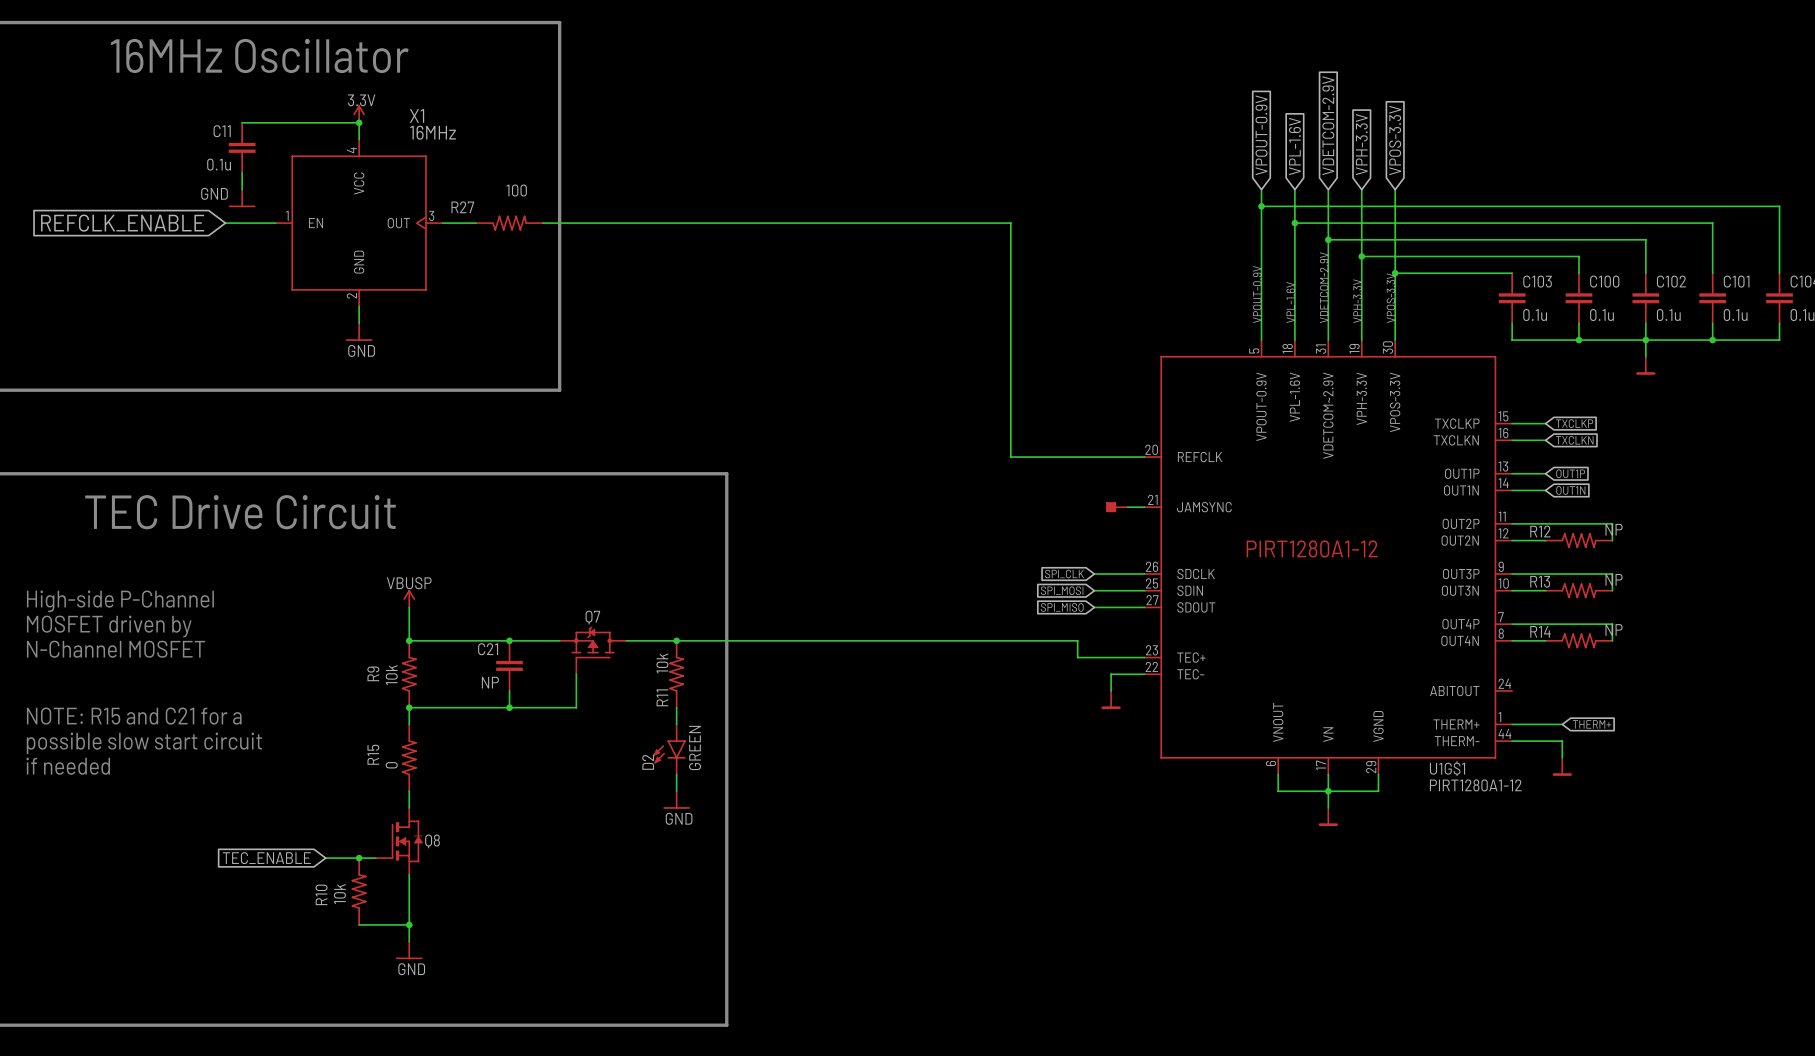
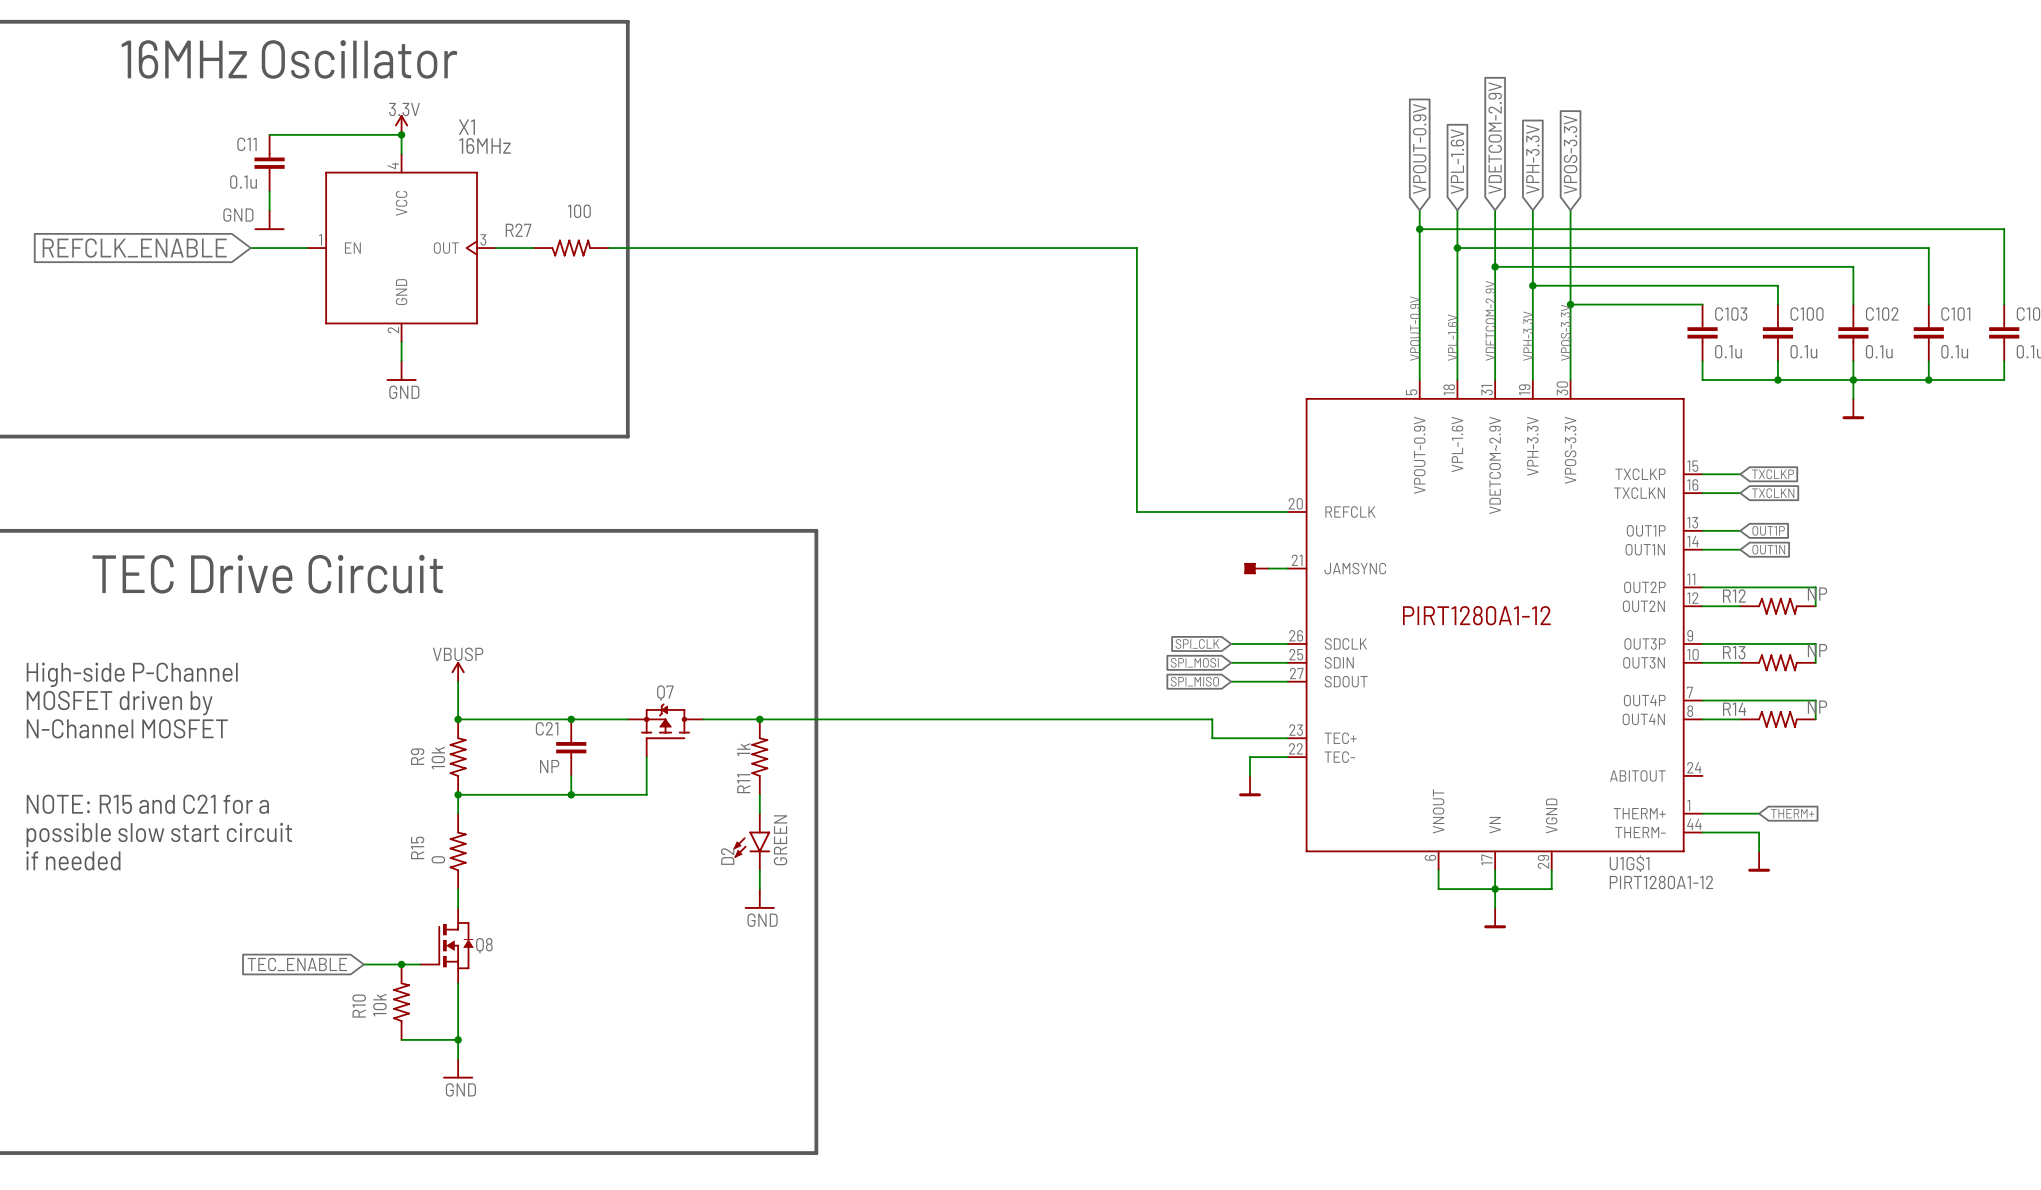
R11 value: 10k (662, 663) -> 1k (743, 749)

